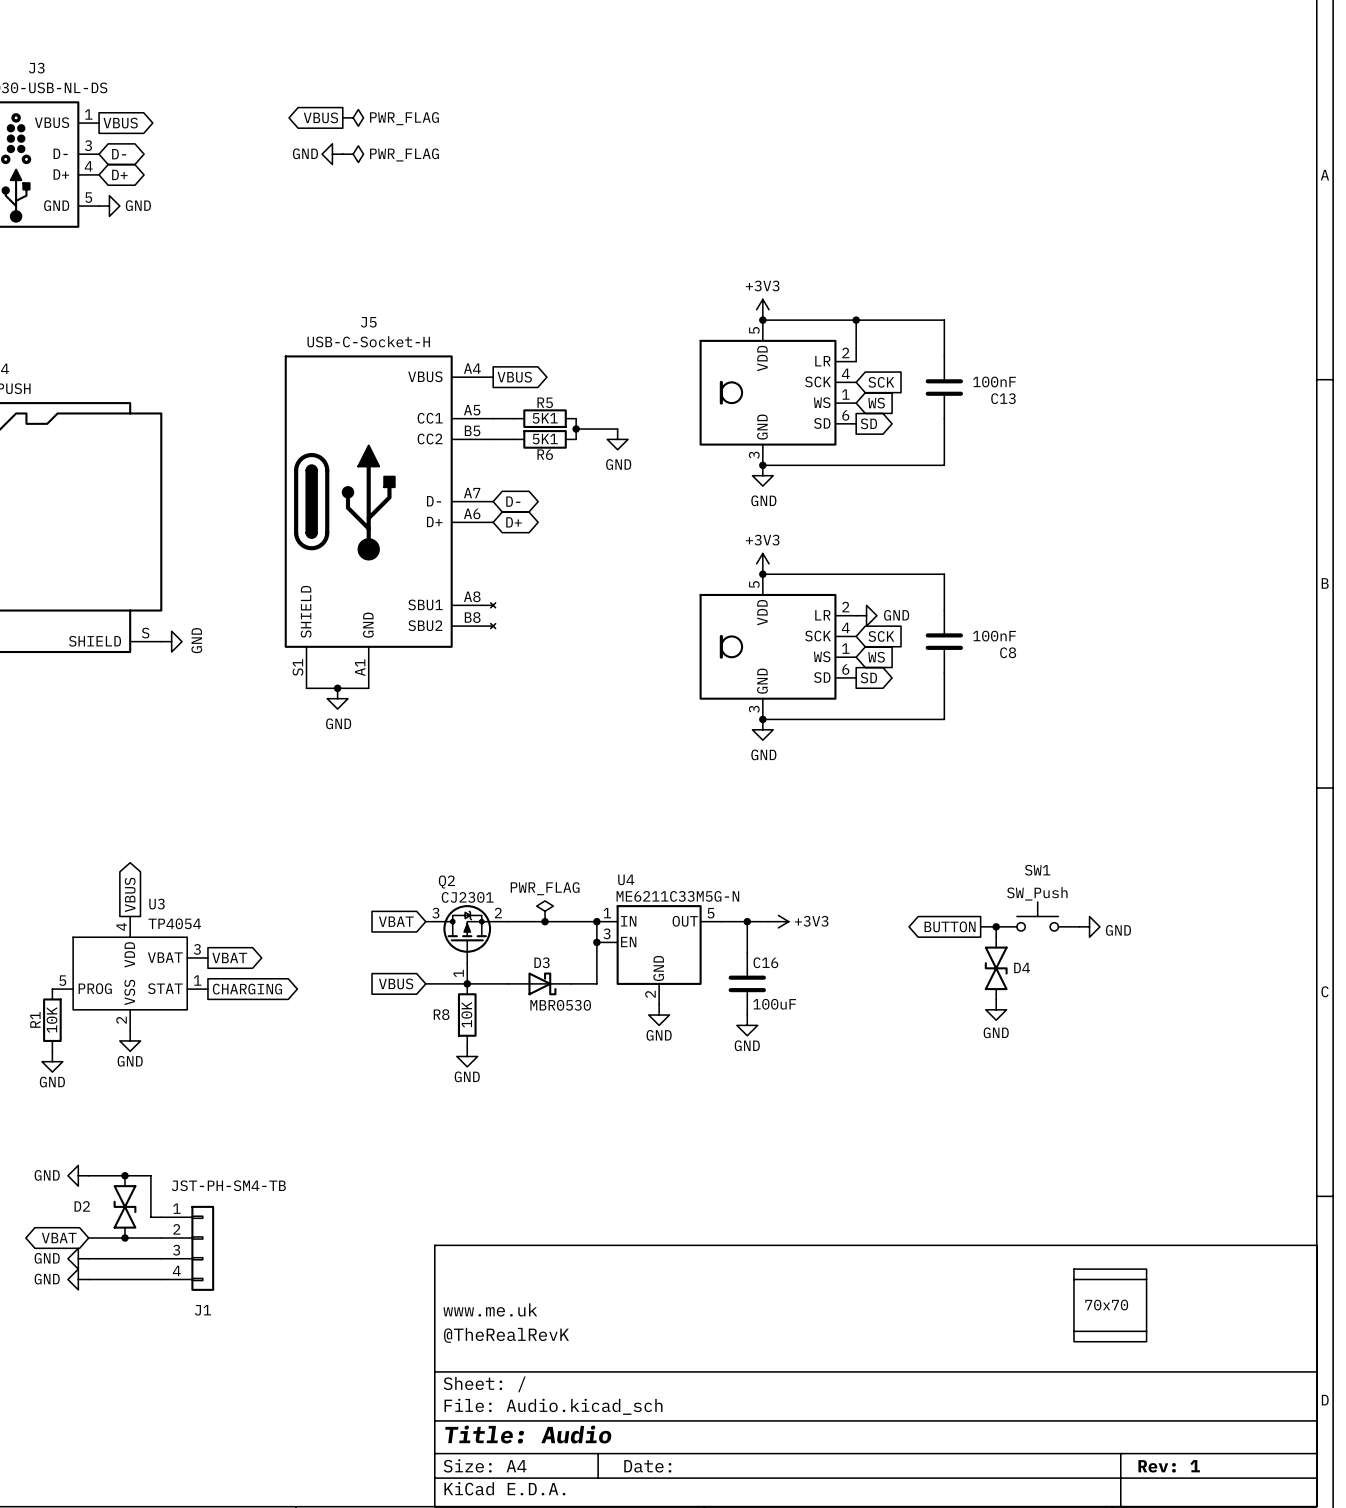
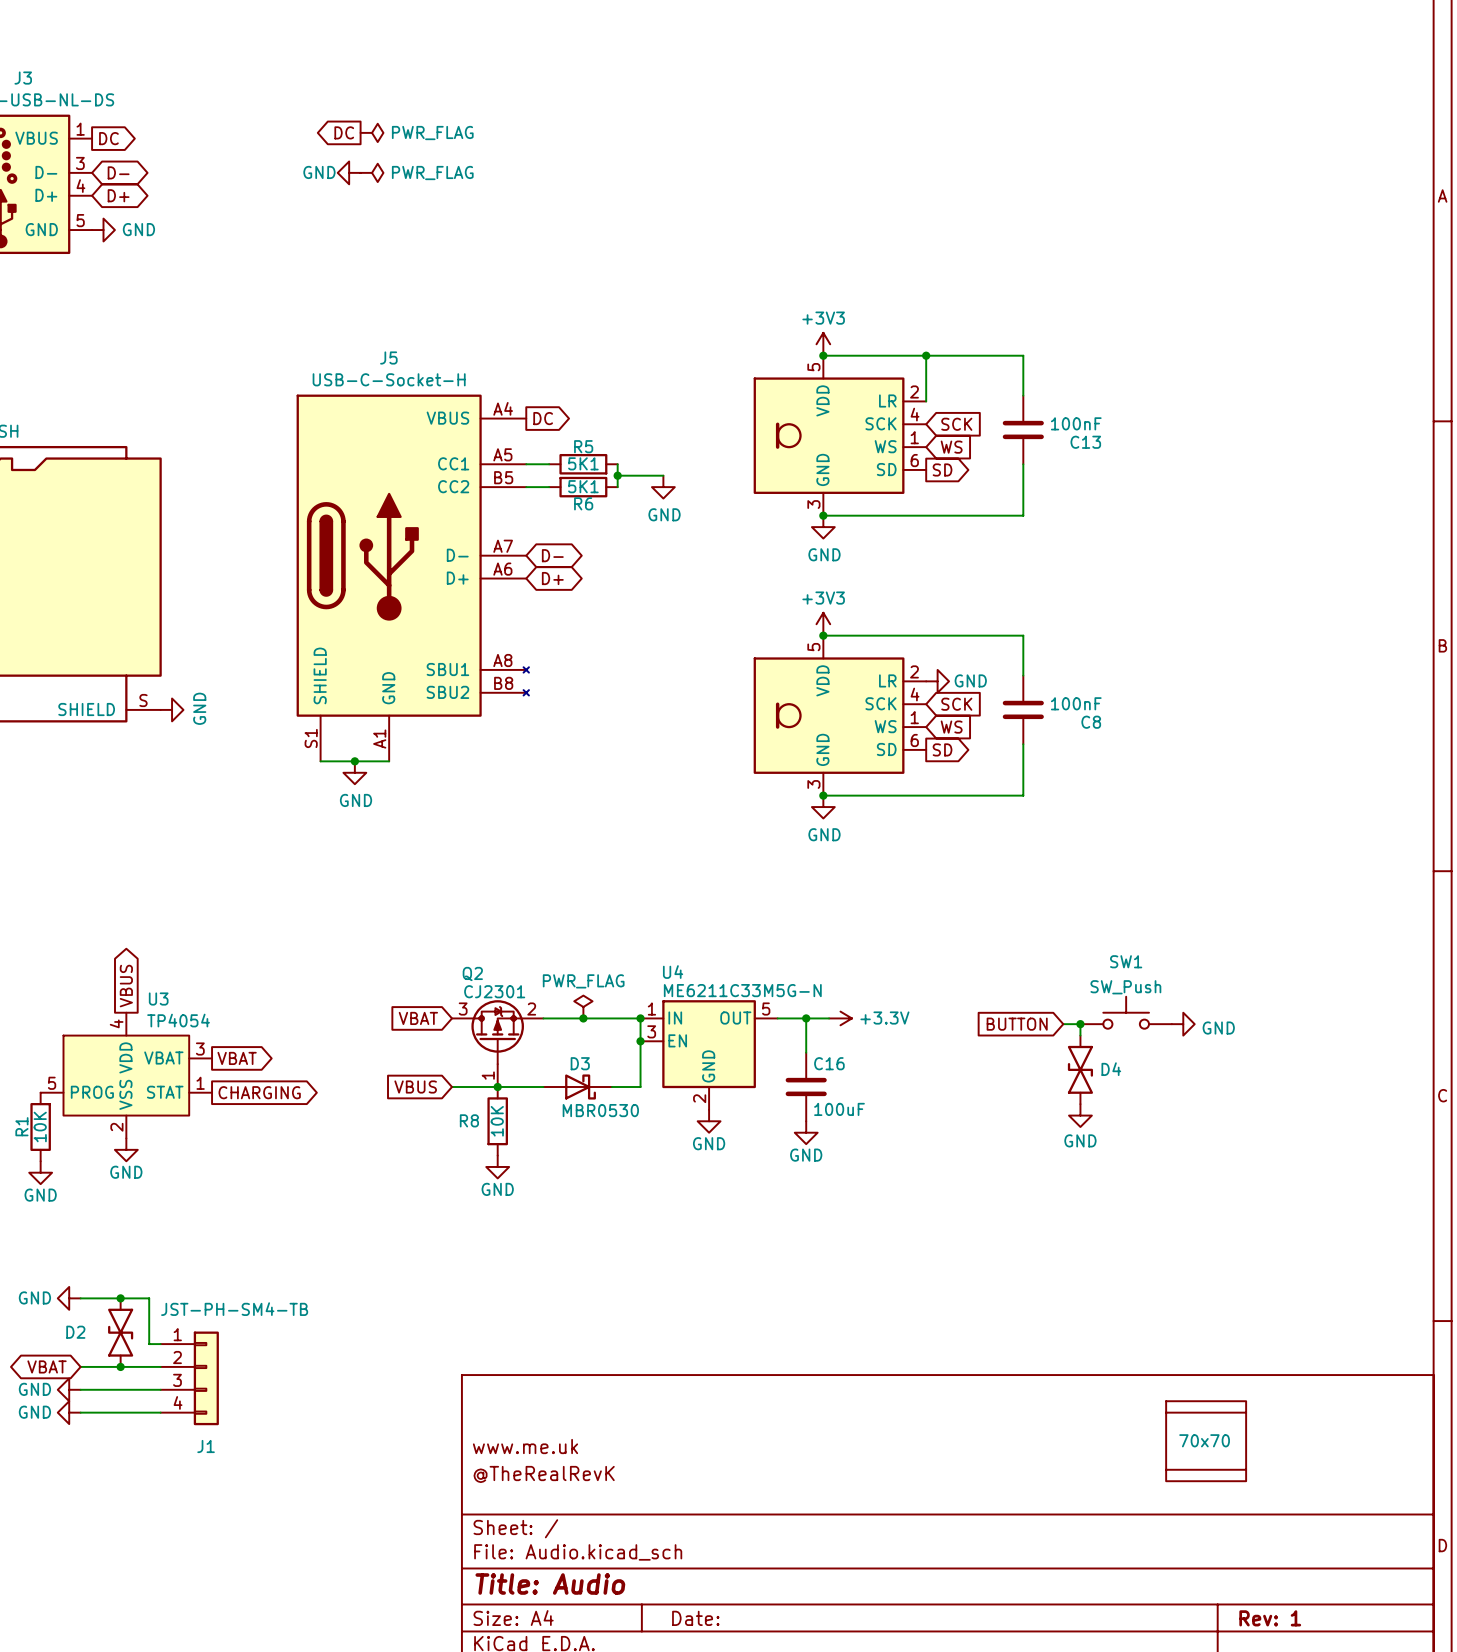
global label: VBUS (320, 117) -> DC (344, 132)
global label: VBUS (120, 123) -> DC (108, 138)
global label: VBUS (514, 377) -> DC (543, 418)
power symbol: +3V3 (778, 921) -> +3.3V (840, 1018)
global label shape: output (950, 926) -> input (1017, 1024)

